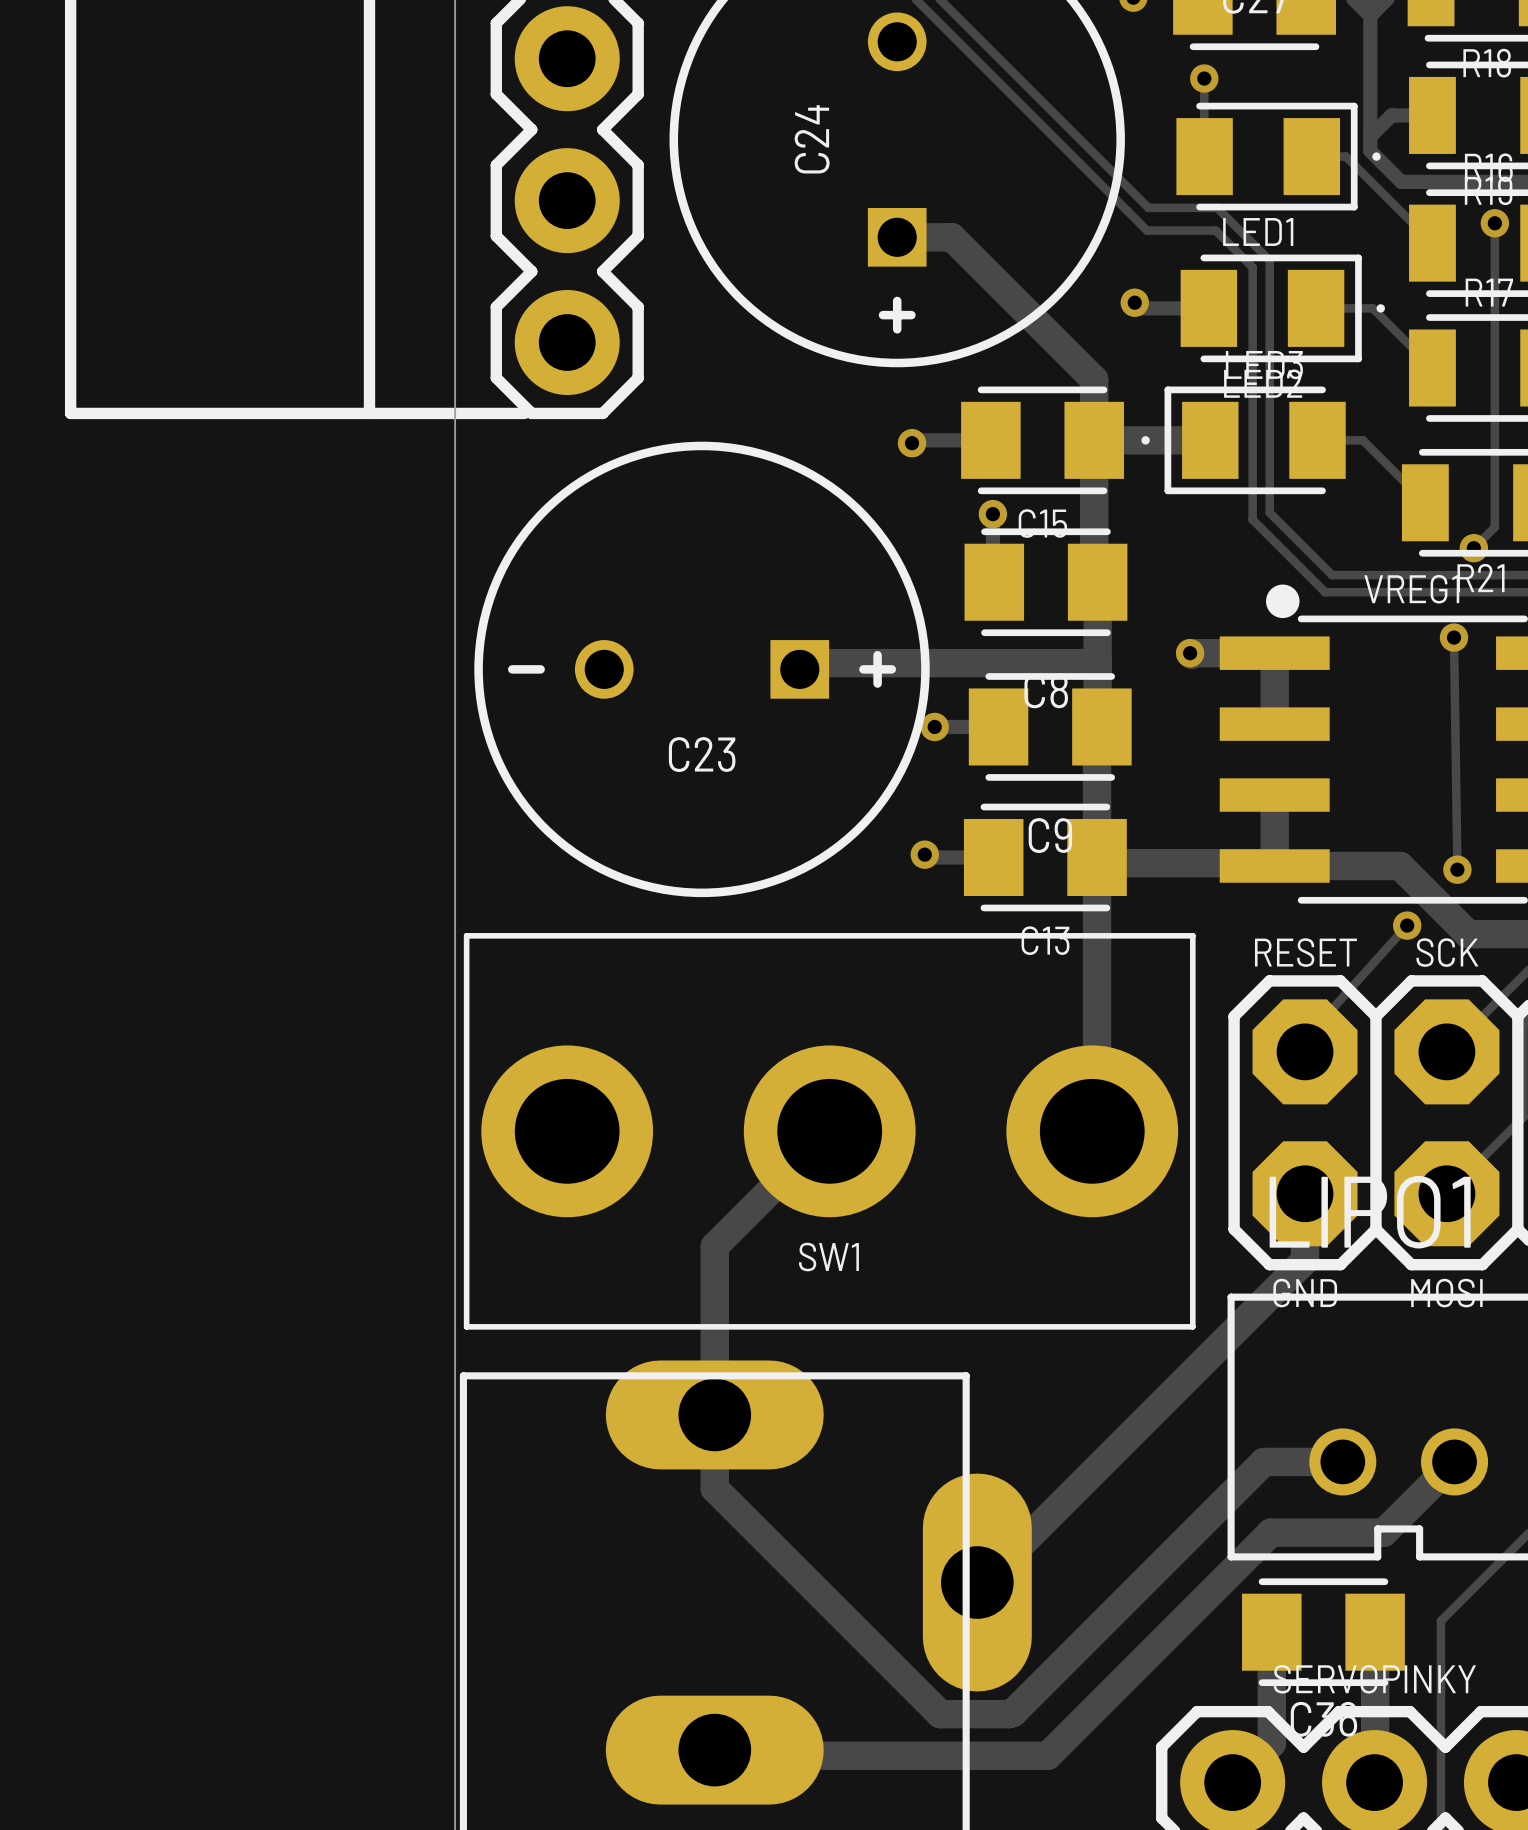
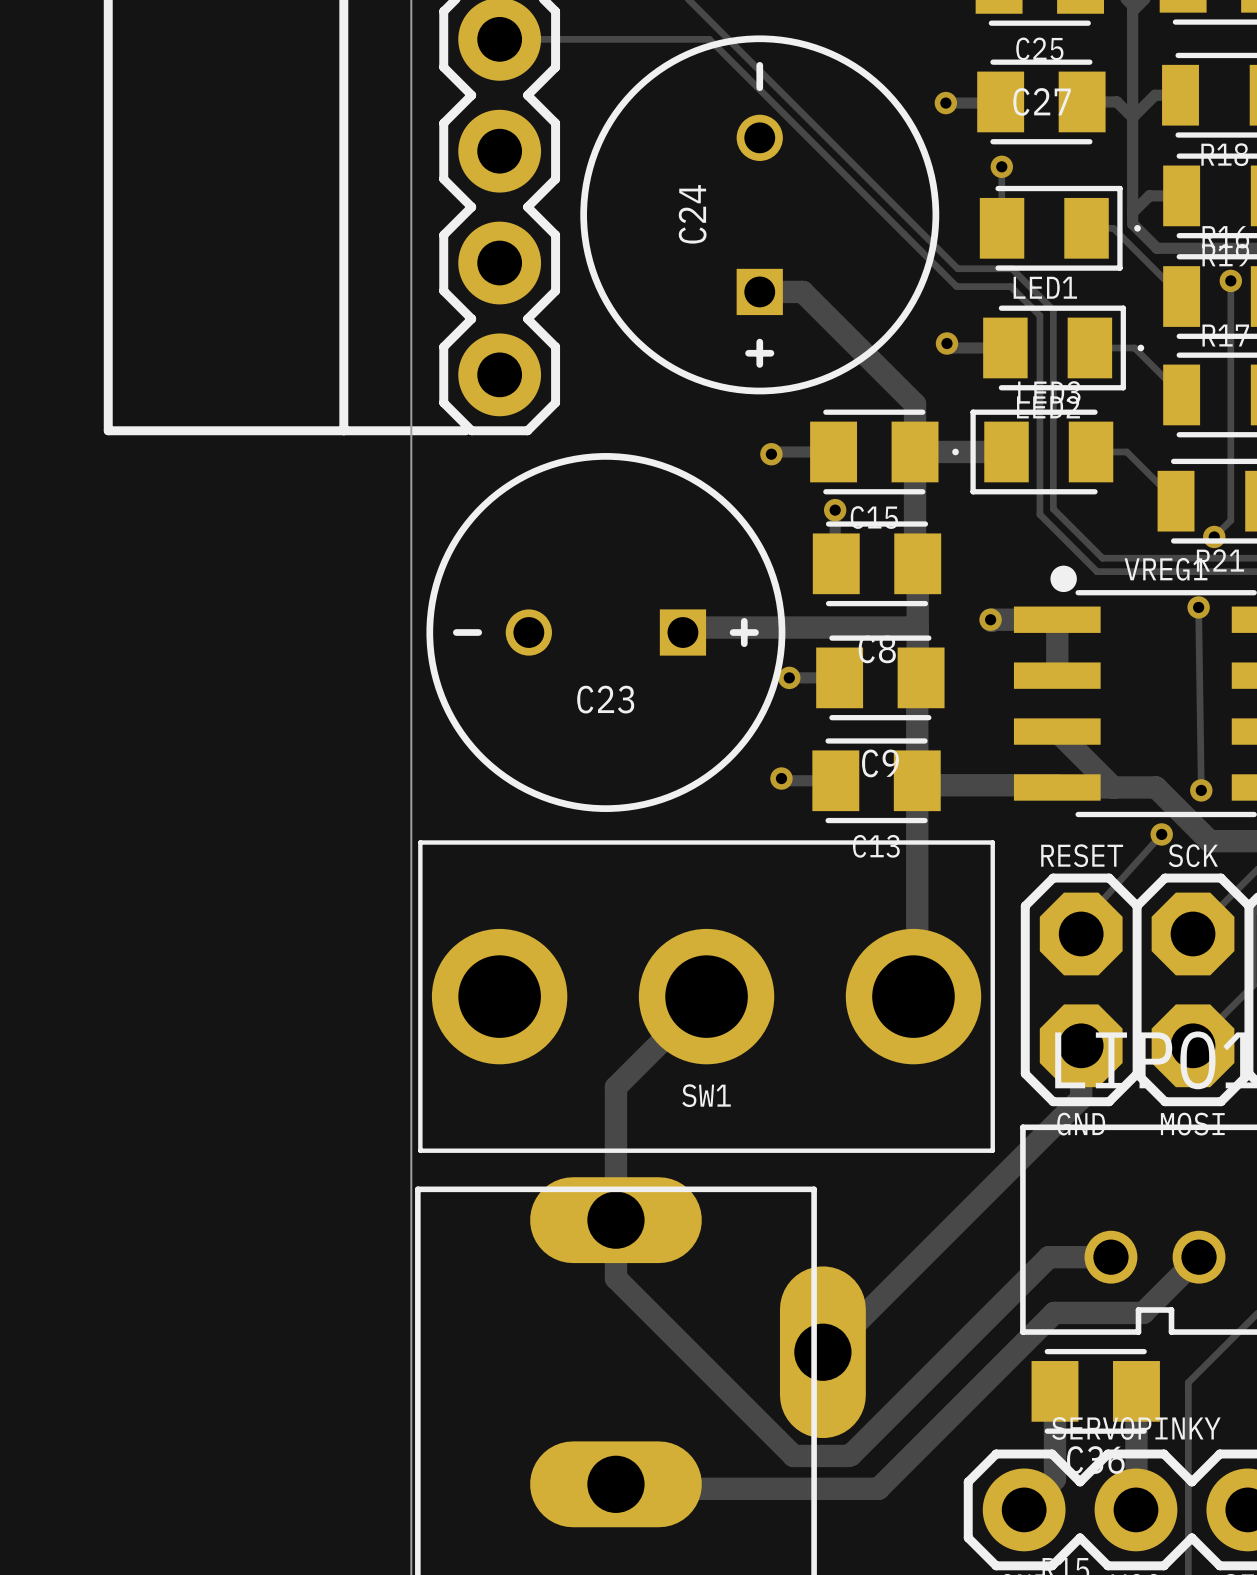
track: (1274, 795) (1274, 863) -> (1057, 731) (1113, 787)

